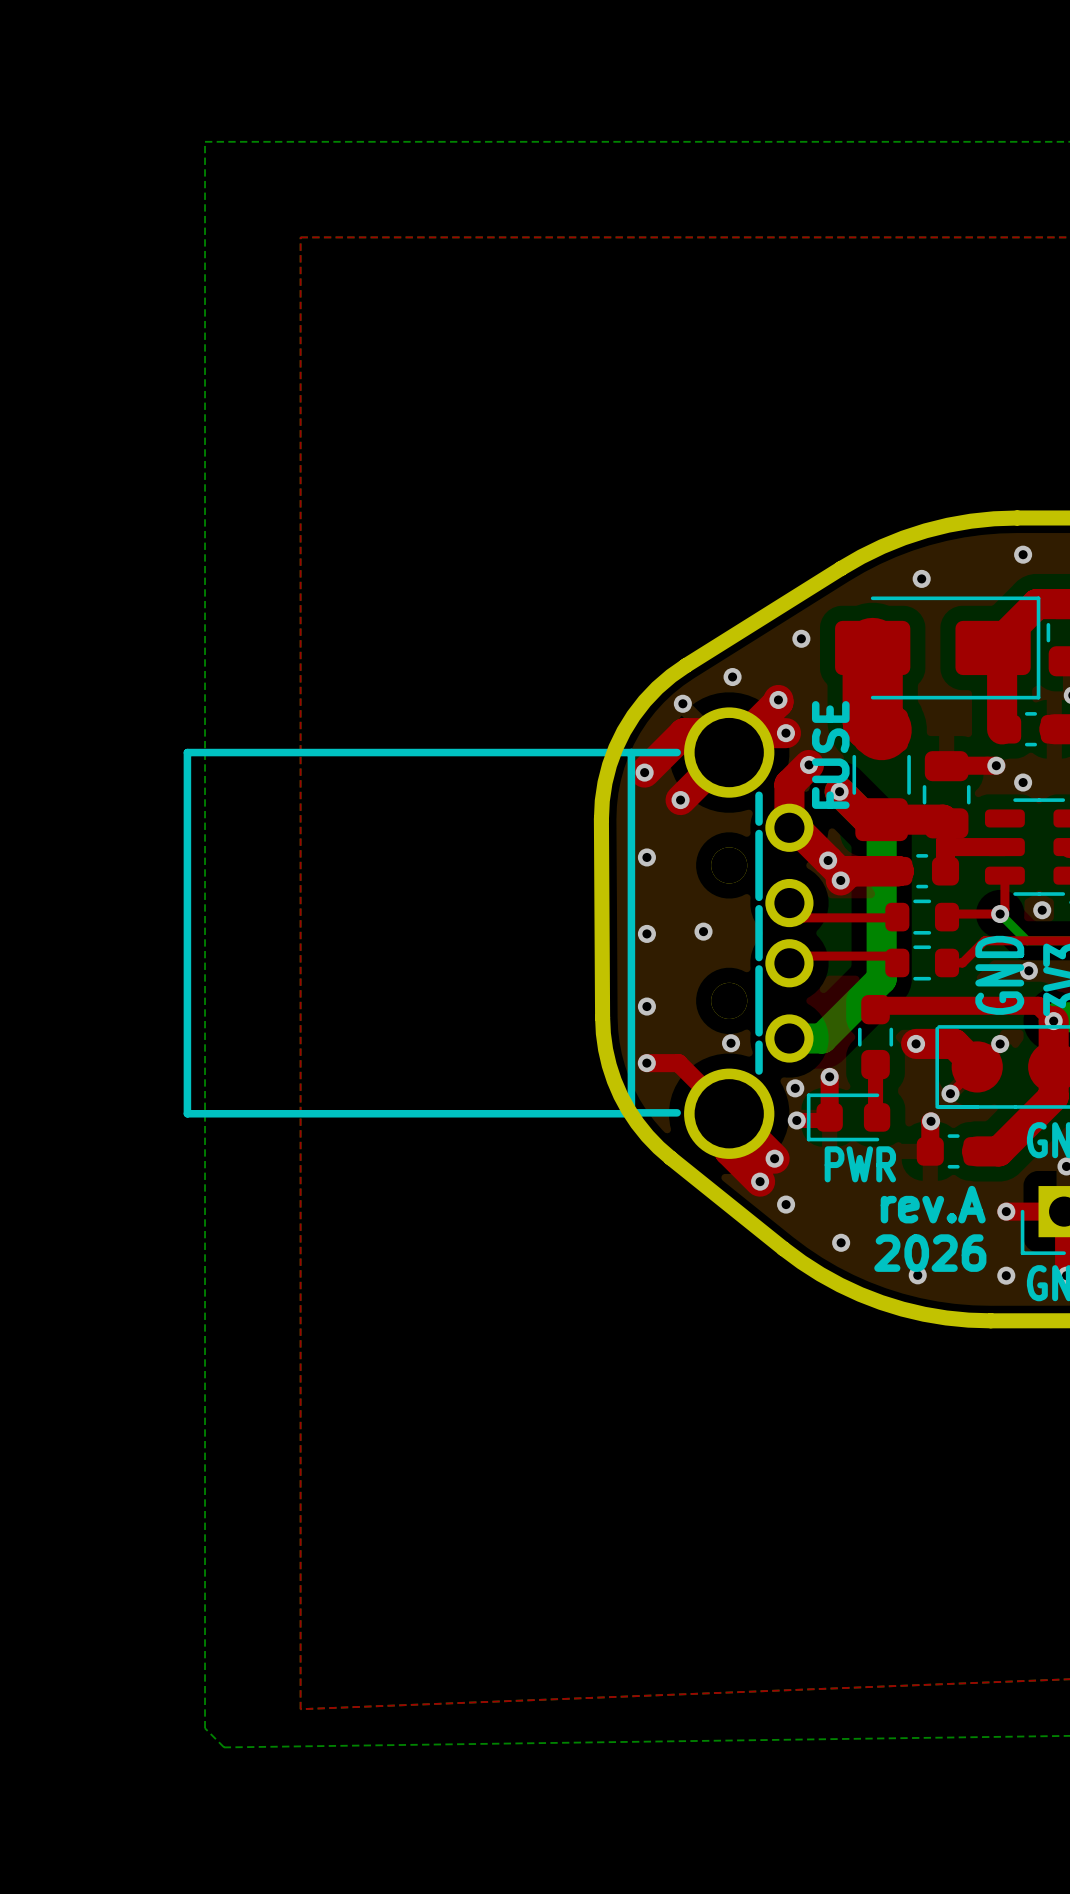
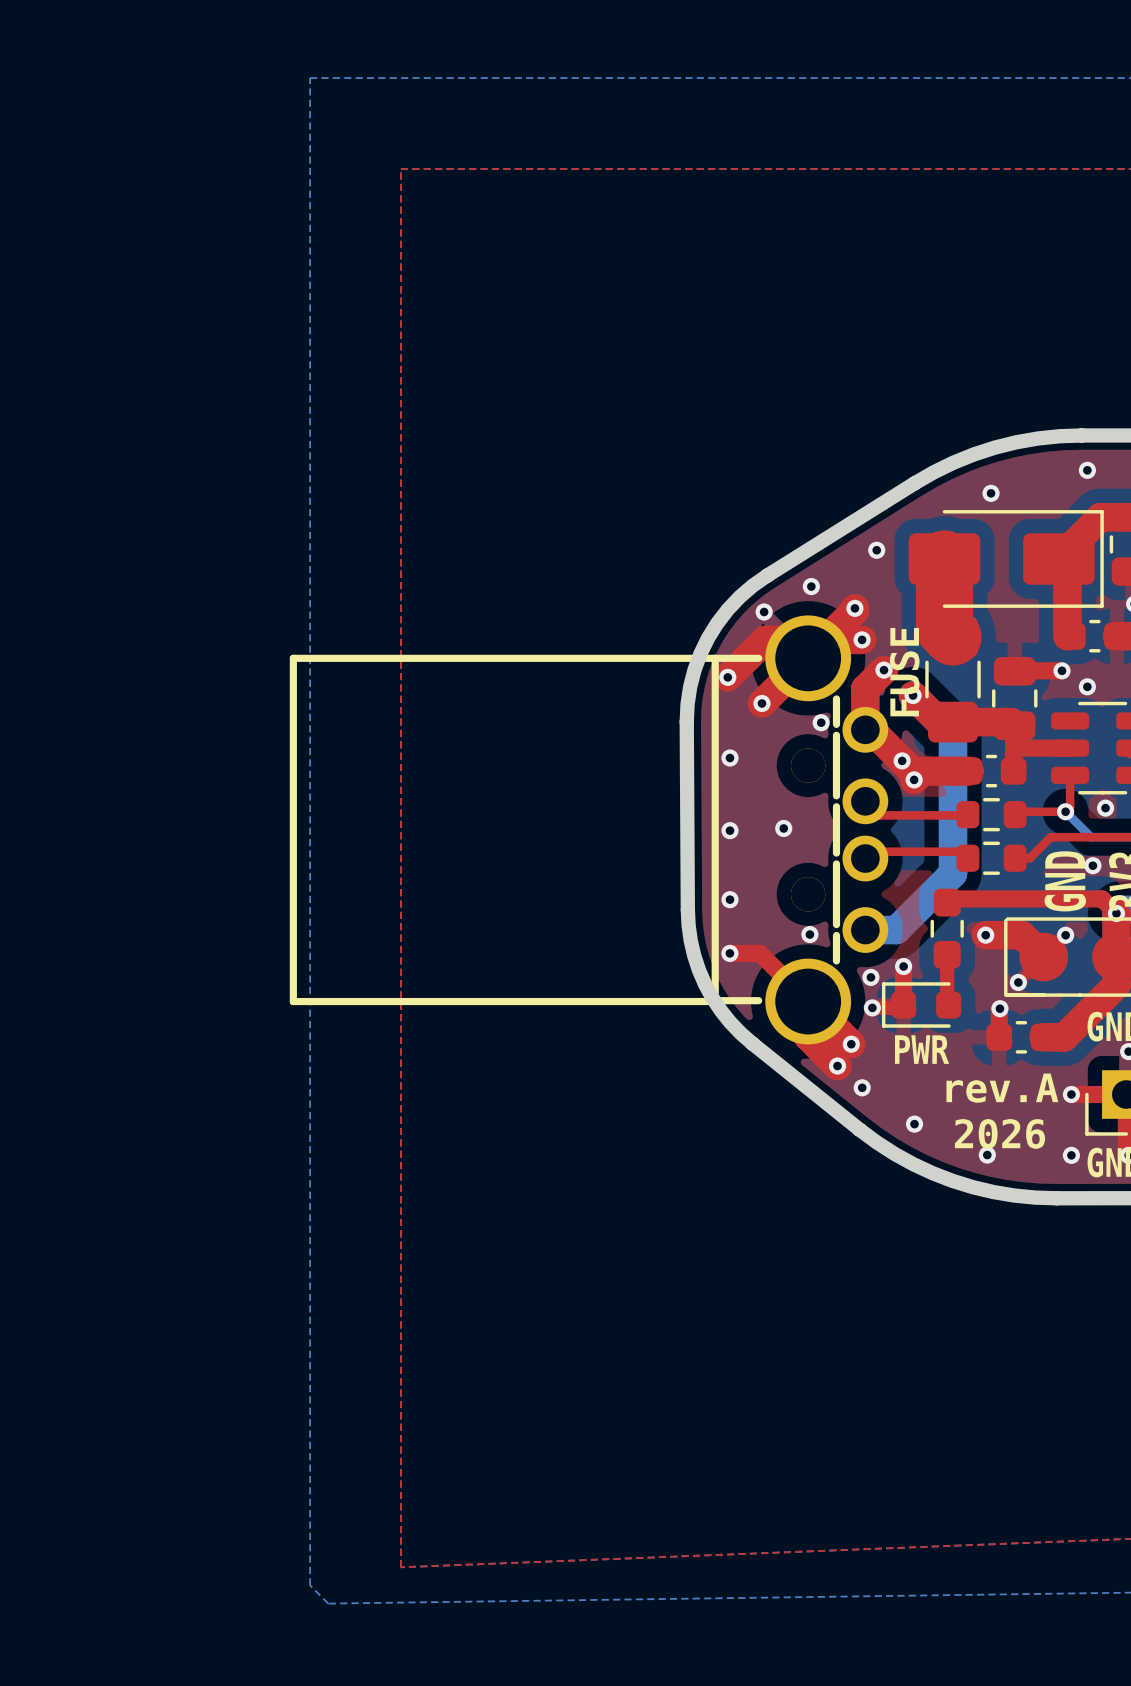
via: none -> (821, 722)

